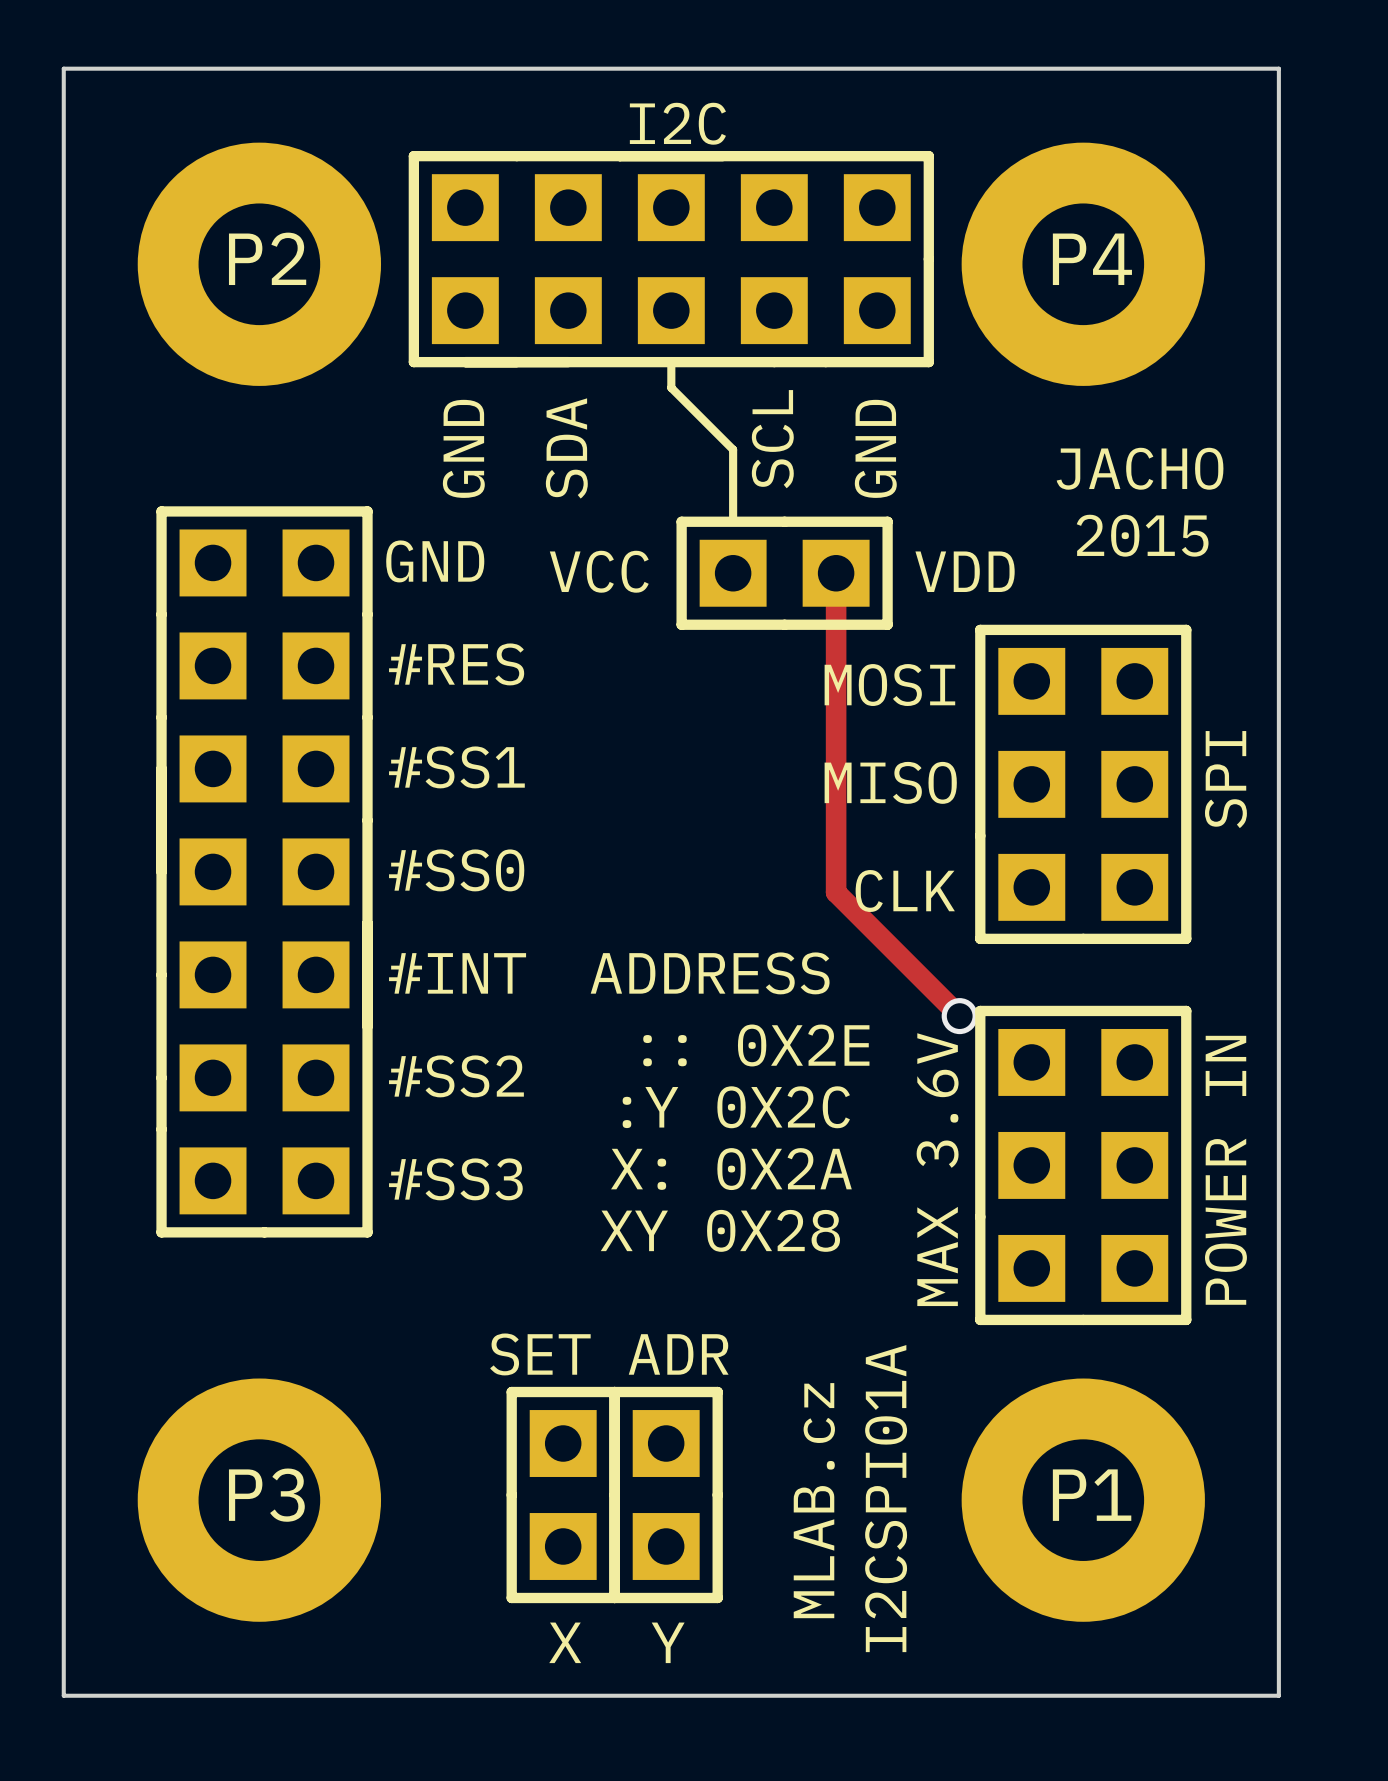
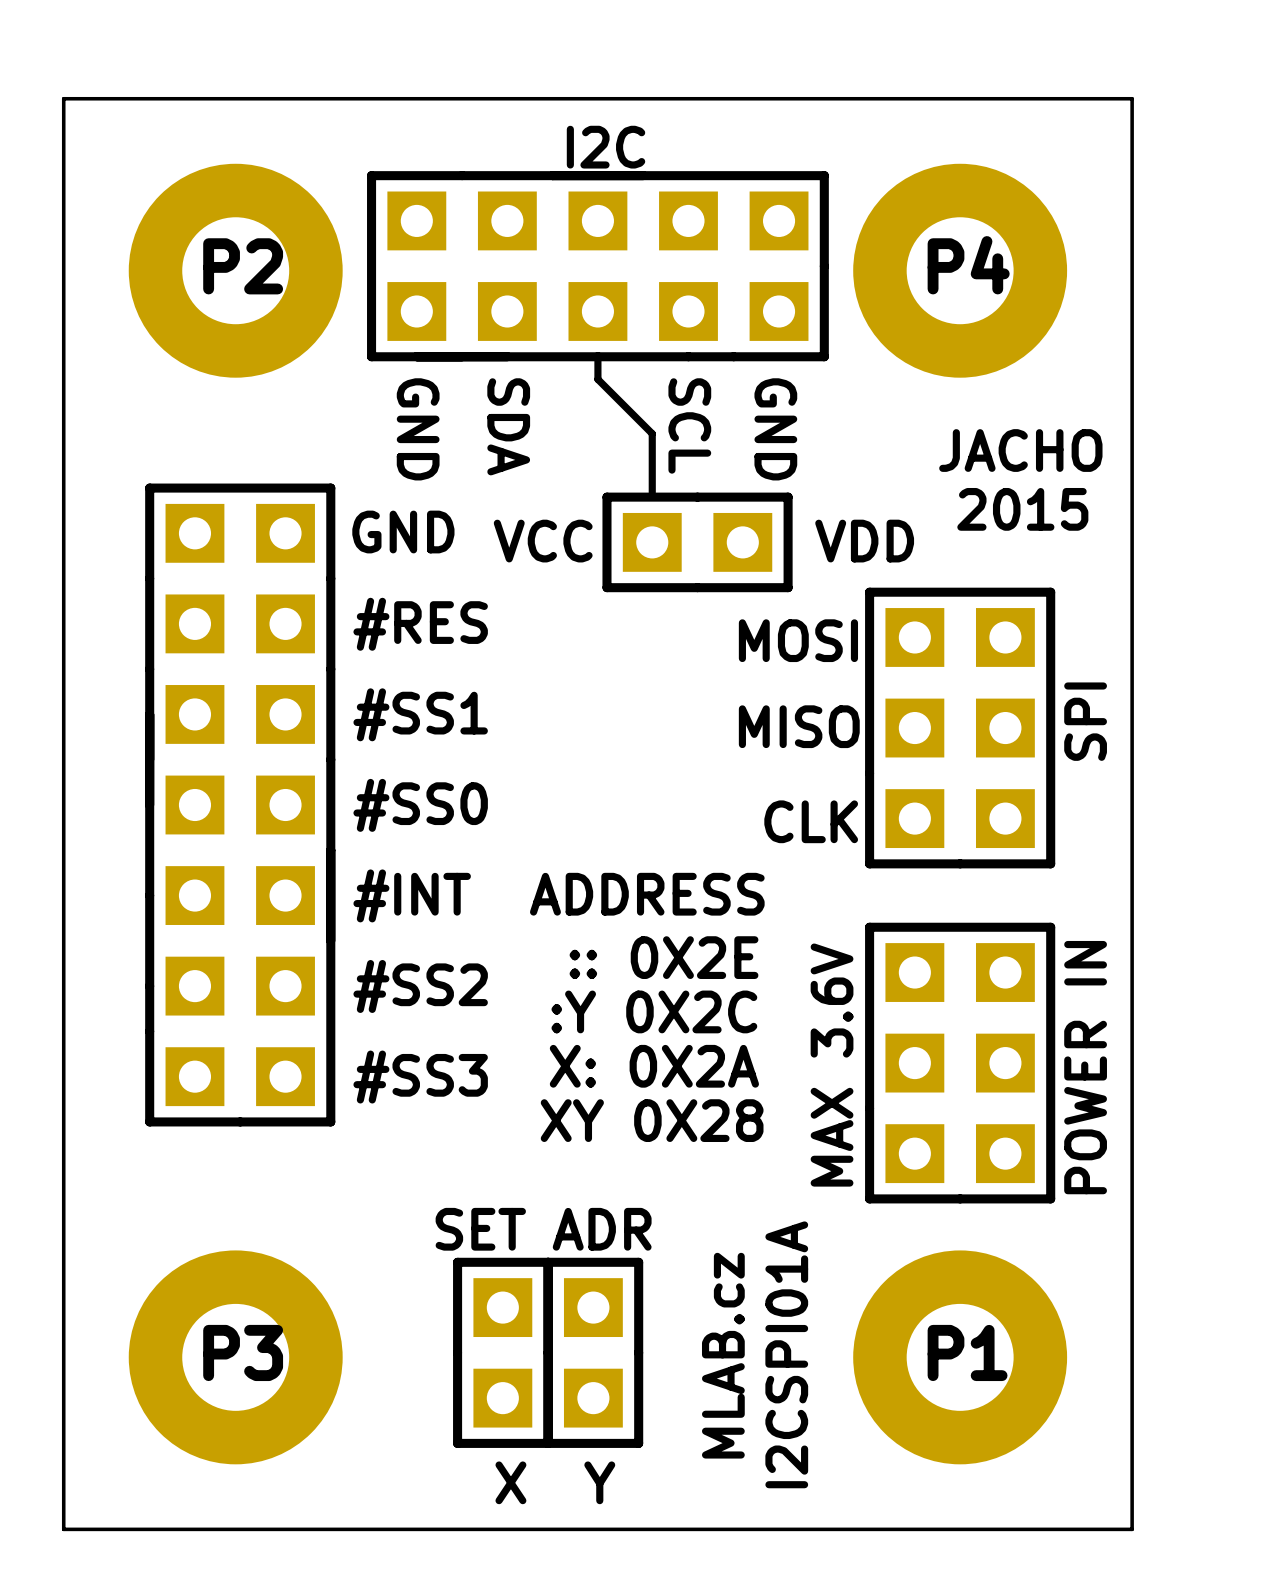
text rotation: 0° (772, 439) -> 180° (689, 425)
text rotation: 0° (463, 448) -> 180° (418, 429)
text rotation: 0° (566, 448) -> 180° (508, 426)
text rotation: 0° (875, 448) -> 180° (775, 429)
track: (836, 573) (836, 892) (959, 1016) -> none
via: (959, 1016) -> none

